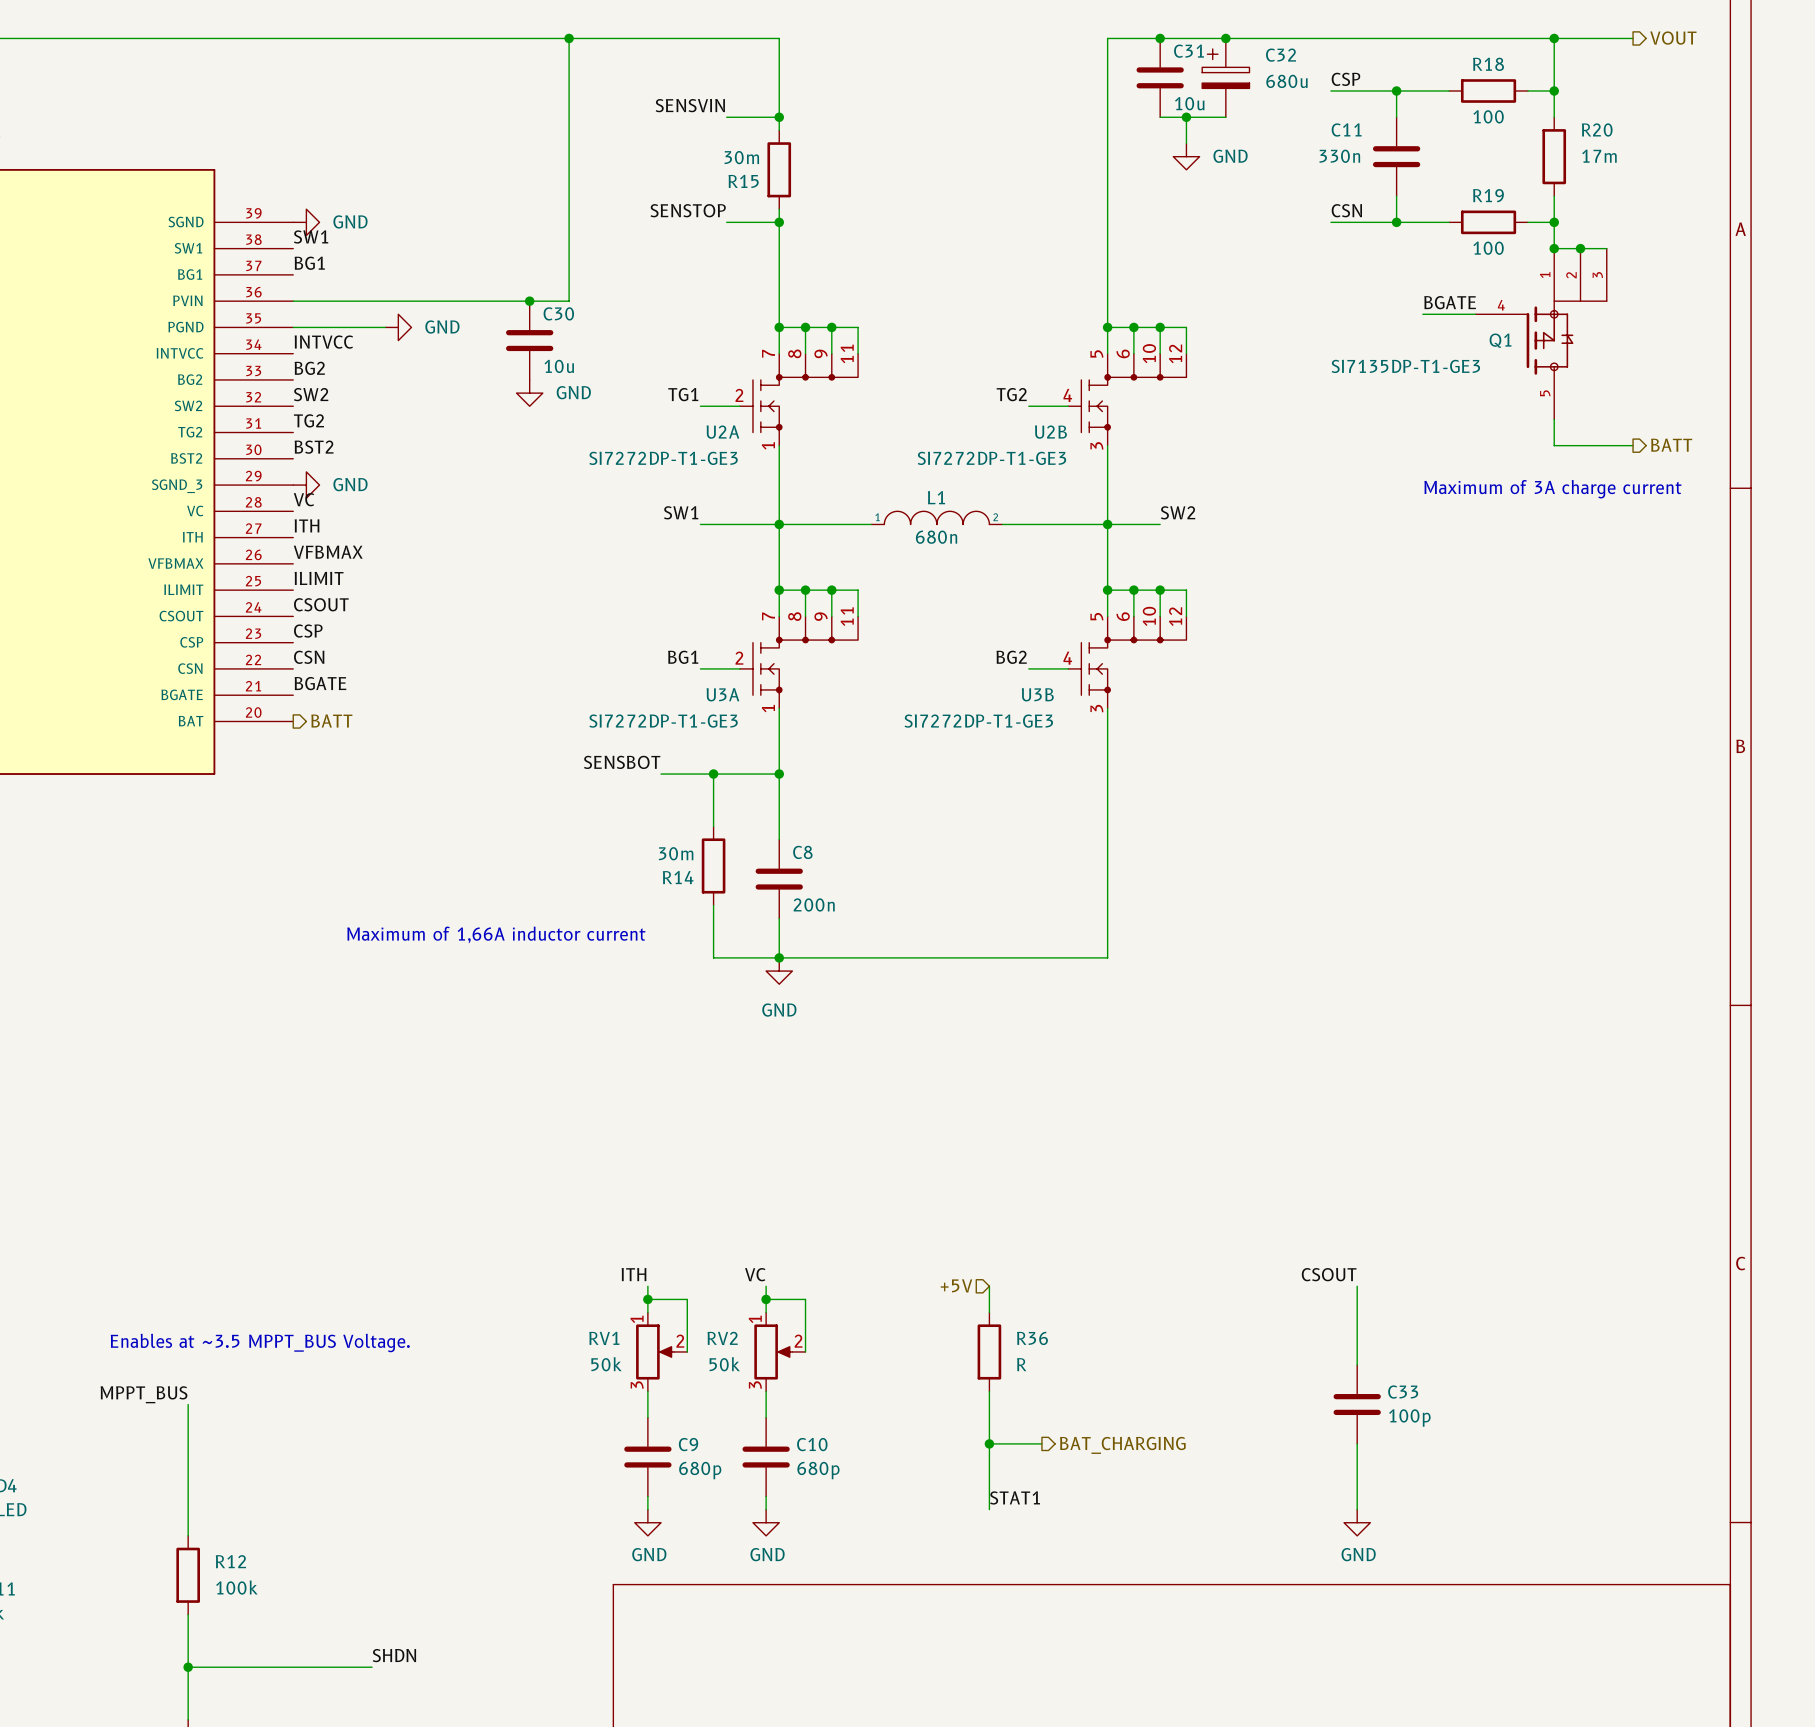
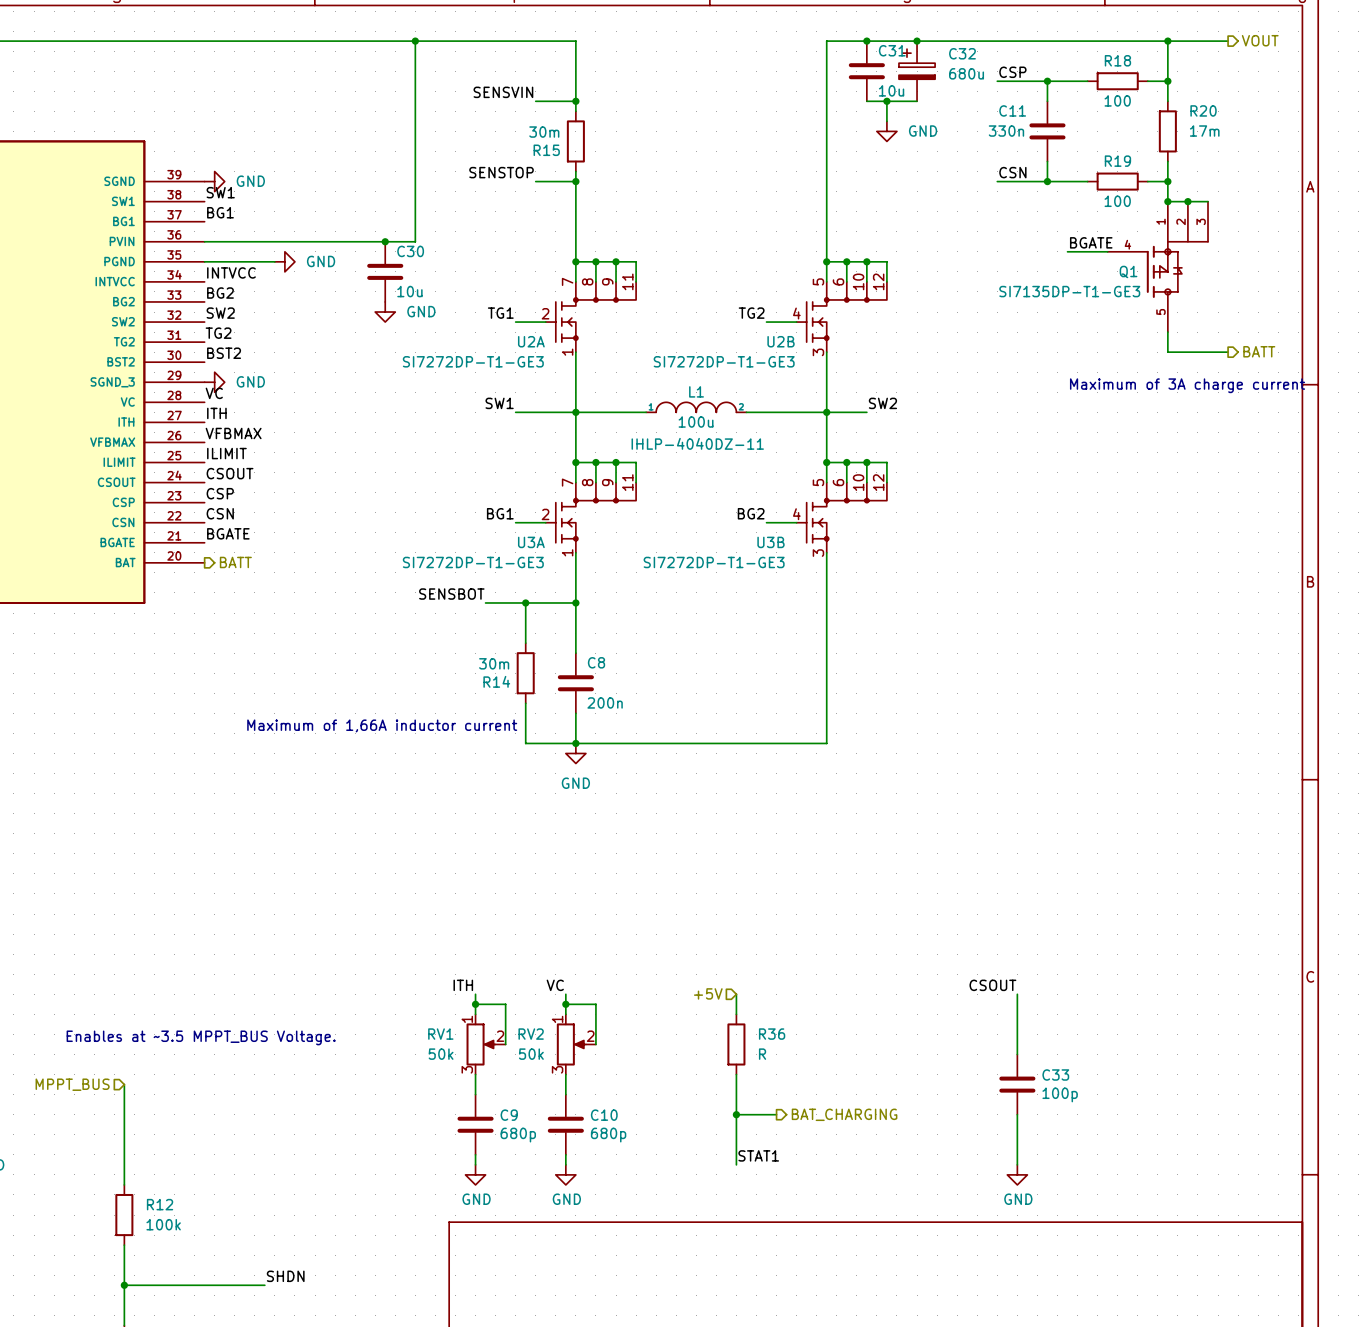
L1 value: 680n (936, 537) -> 100u (696, 422)
L1 text: none -> IHLP-4040DZ-11 (697, 443)
label: MPPT_BUS (144, 1394) -> none
hierarchical label: none -> MPPT_BUS (72, 1084)

